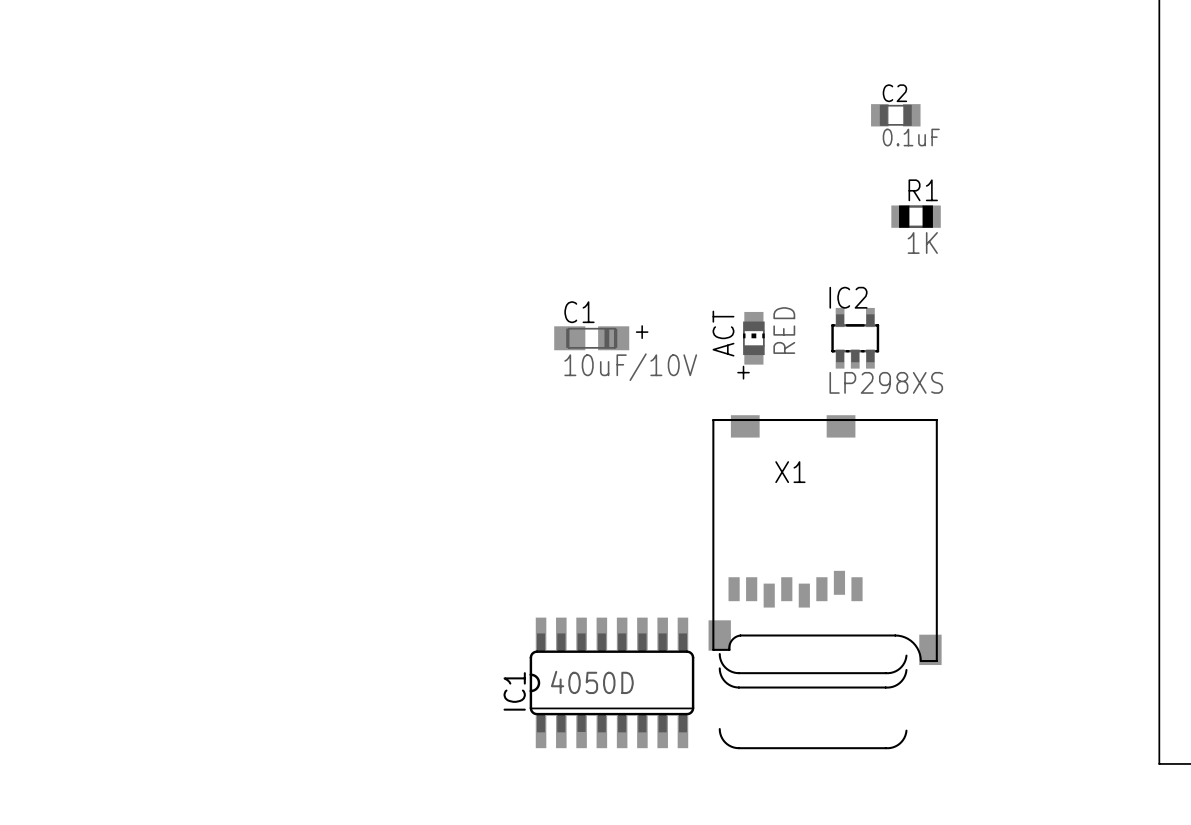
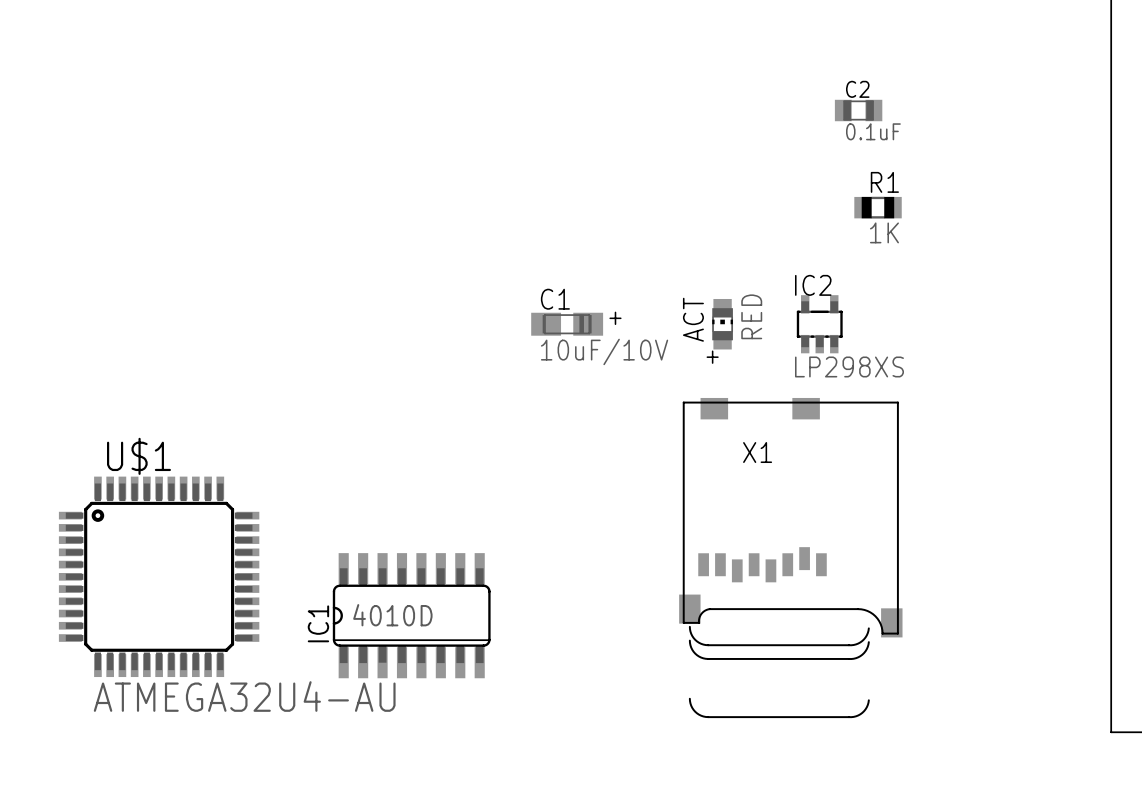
U$1: none -> ATMEGA32U4-AU (159, 576)
IC1 value: 4050D (592, 682) -> 4010D (392, 615)
IC1 position: (611, 682) -> (411, 615)

